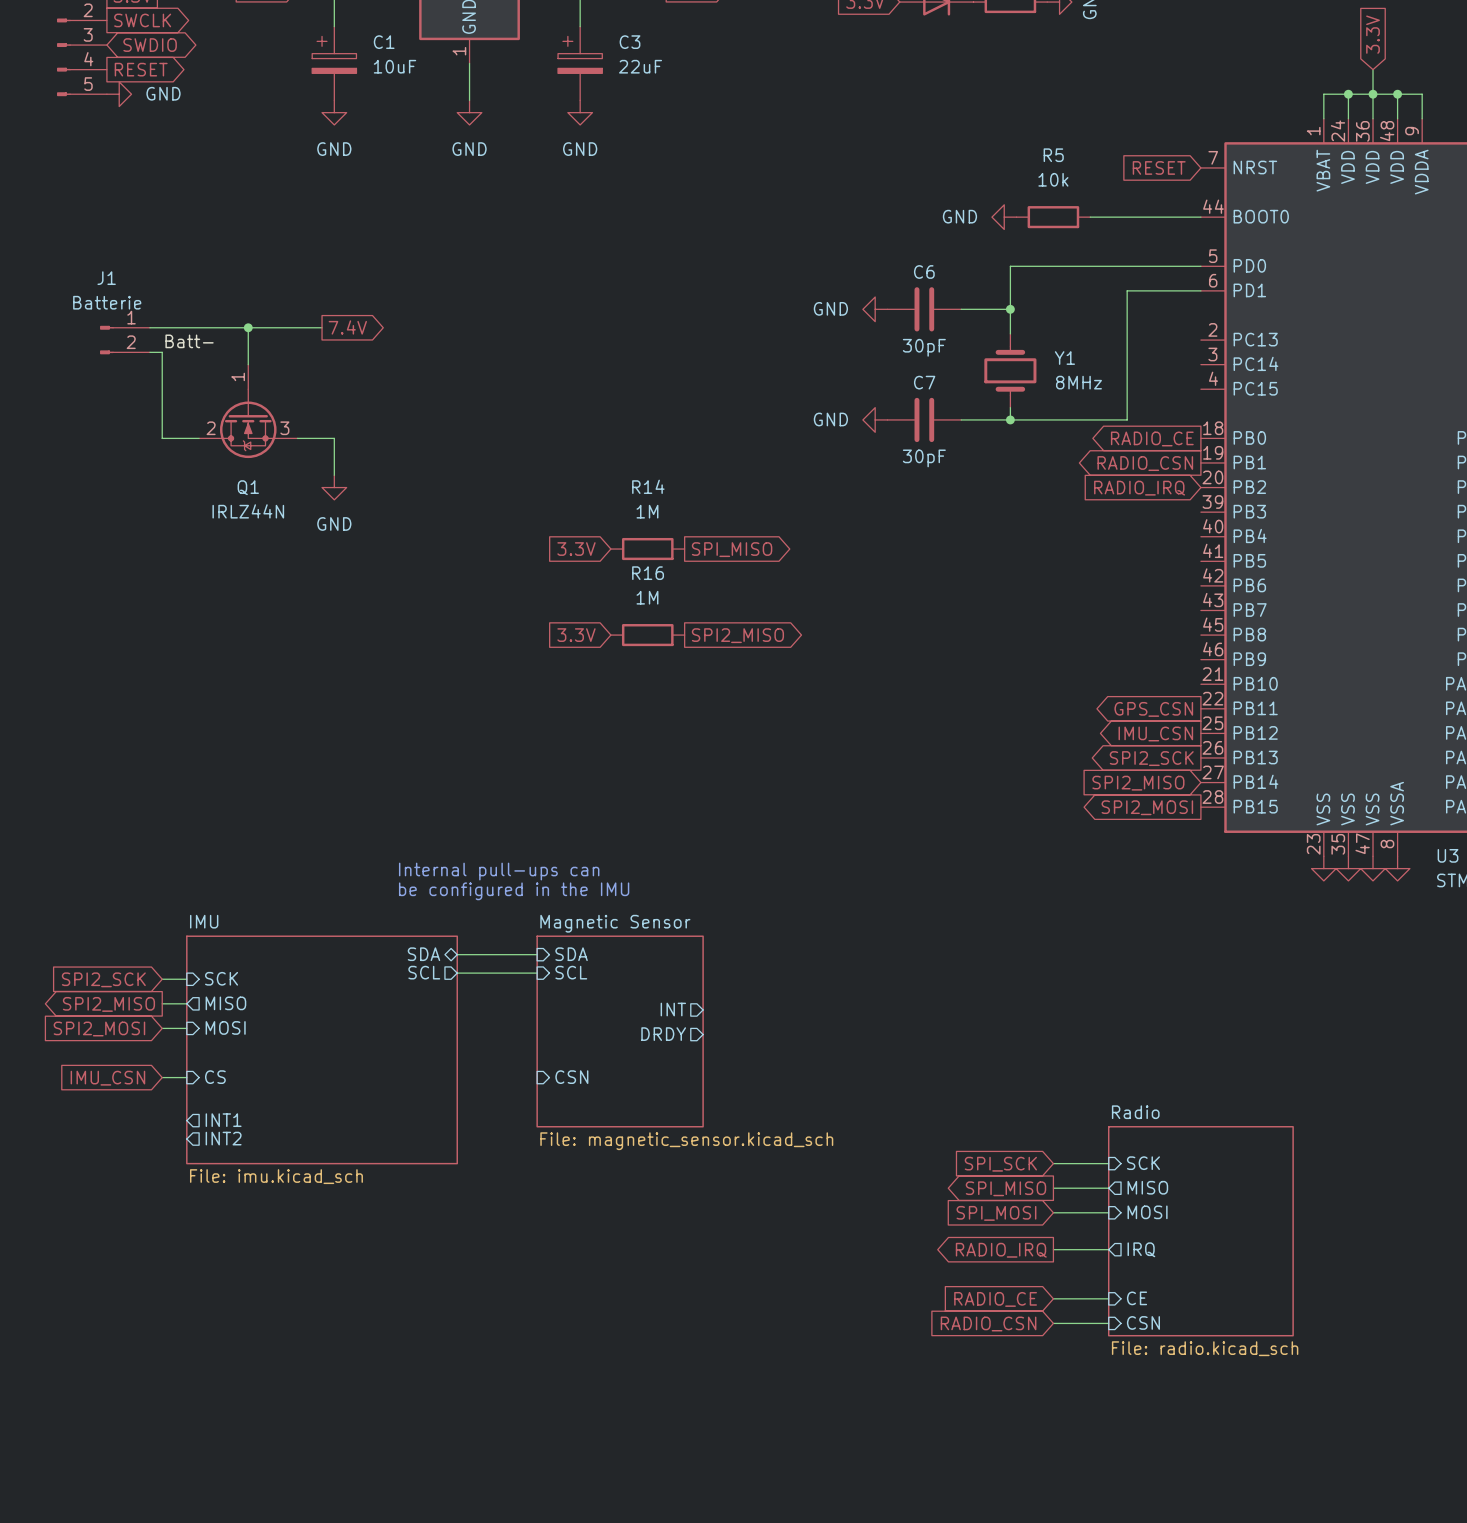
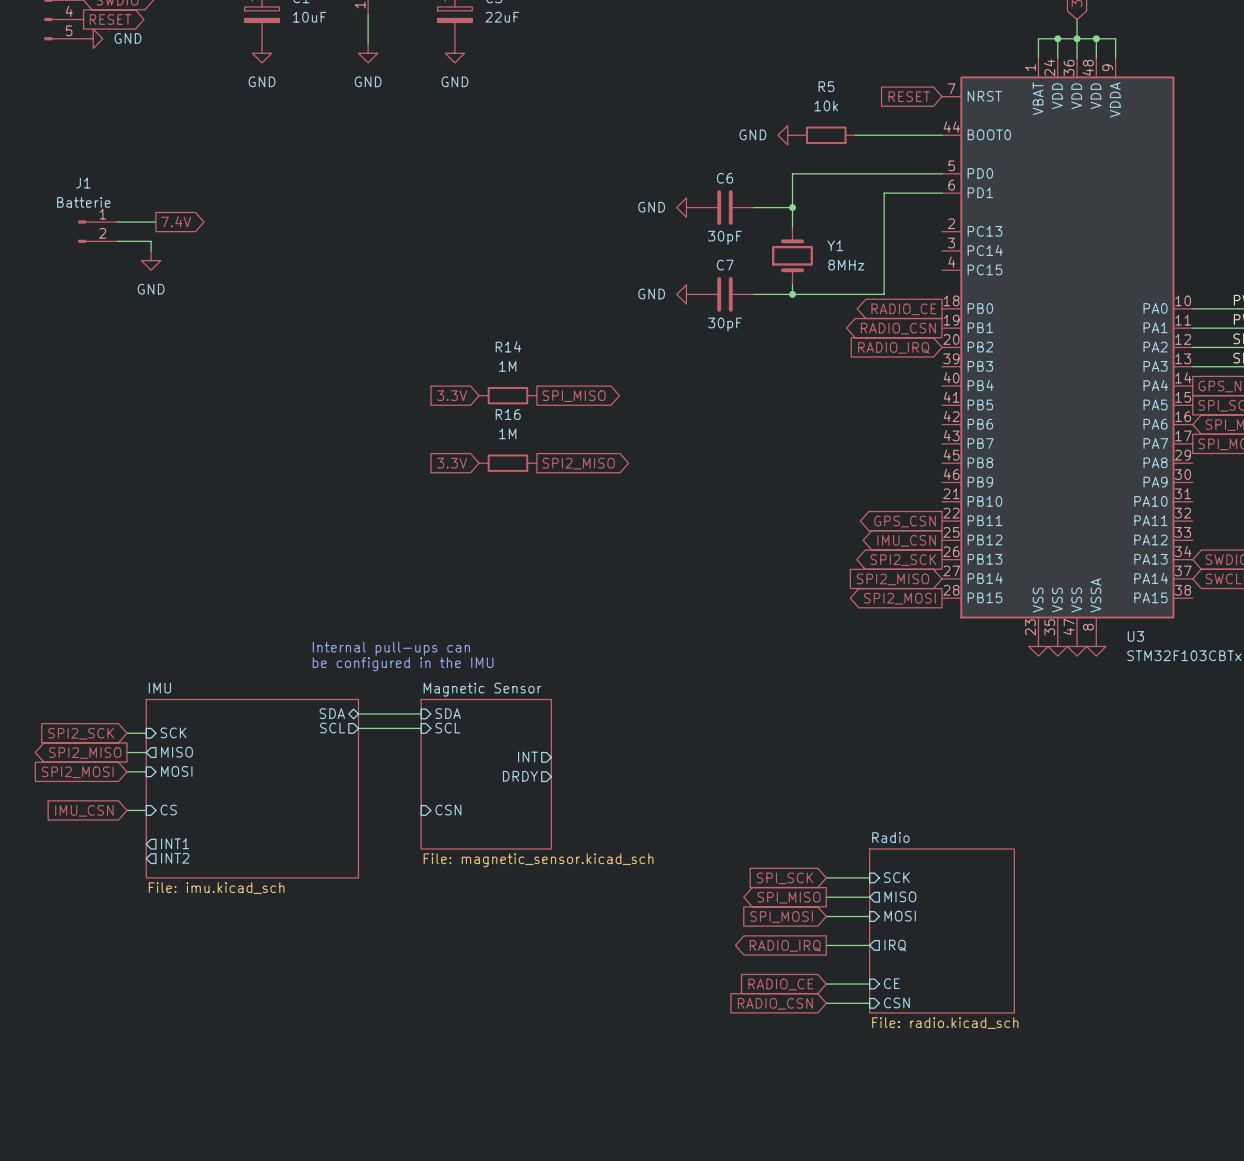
wire: (199, 327) (322, 327) -> none
wire: (248, 327) (248, 364) -> none
junction: (248, 327) -> none
global label position: 7.4V (347, 327) -> 7.4V (176, 221)
label: Batt- (189, 341) -> none
wire: (162, 352) (162, 438) (199, 438) -> (126, 241) (151, 241) (151, 250)
Q1: IRLZ44N (248, 411) -> none
wire: (297, 438) (334, 438) (334, 475) -> none
power symbol position: GND (334, 487) -> GND (151, 260)

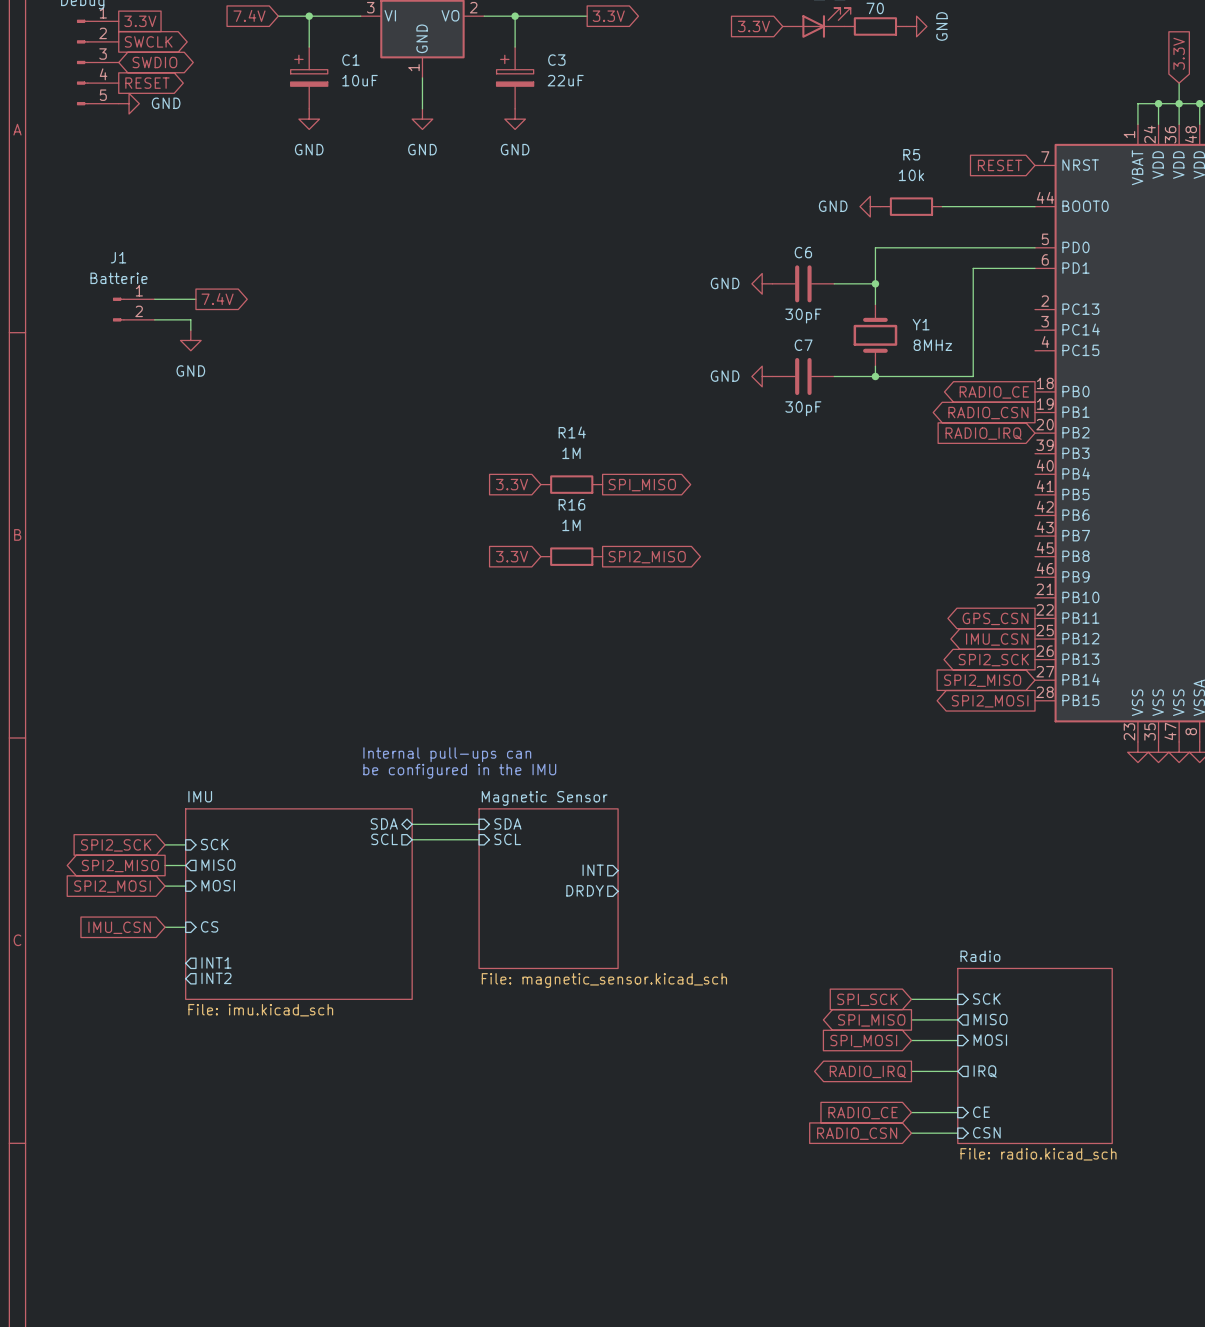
sheet pin: CSN (448, 810) -> none

